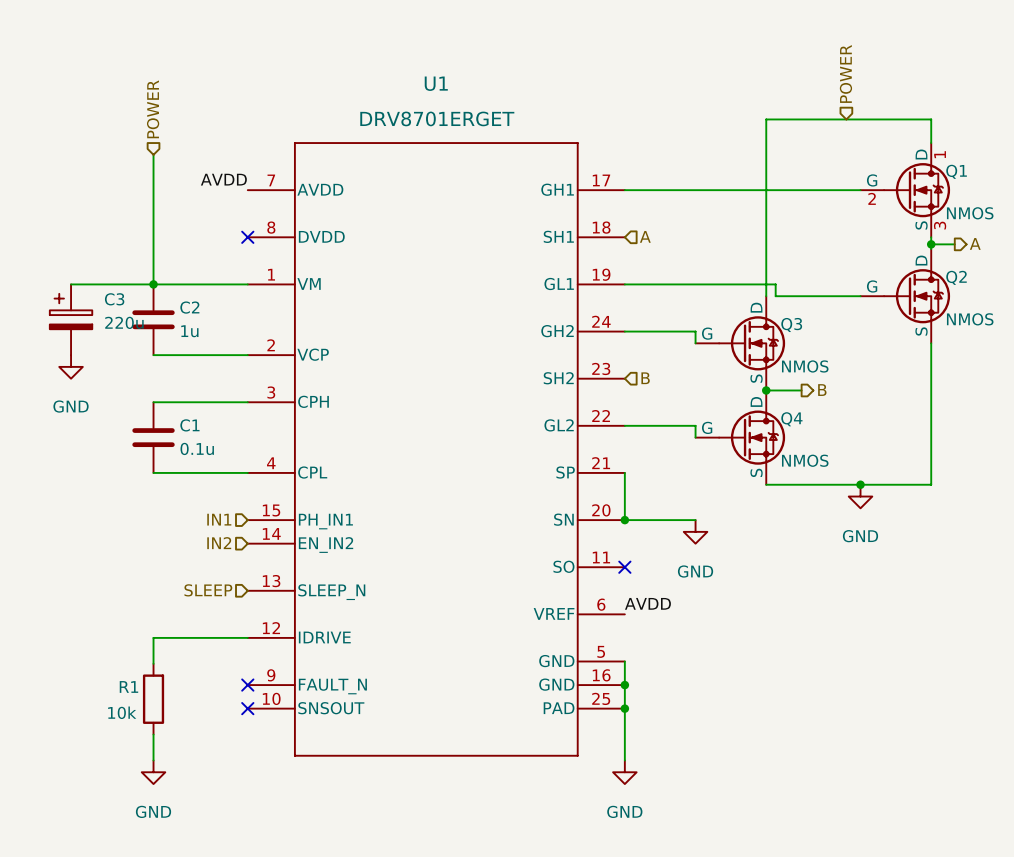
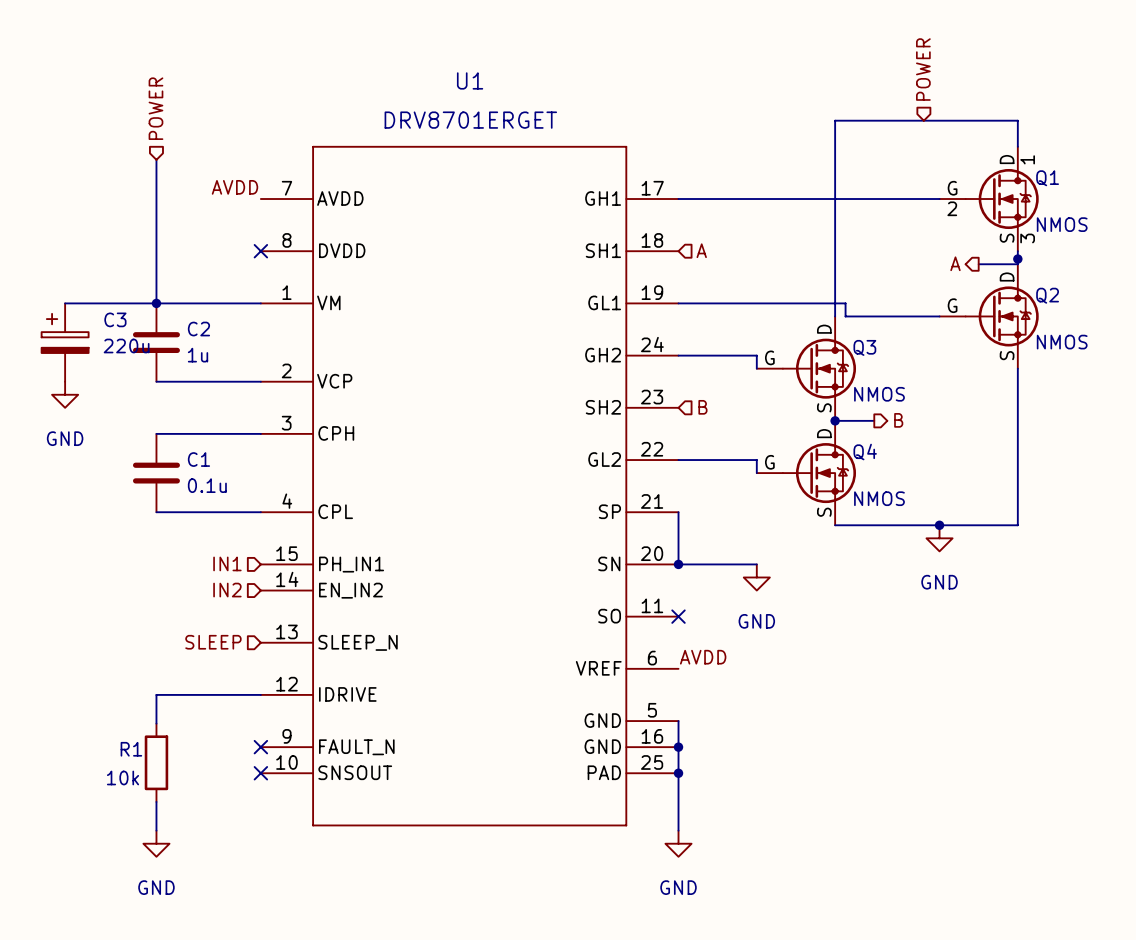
hierarchical label rotation: 0° (975, 243) -> 180° (955, 263)
hierarchical label position: A (975, 243) -> A (955, 263)
wire: (931, 244) (954, 244) -> none
wire: none -> (978, 264) (1017, 264)

